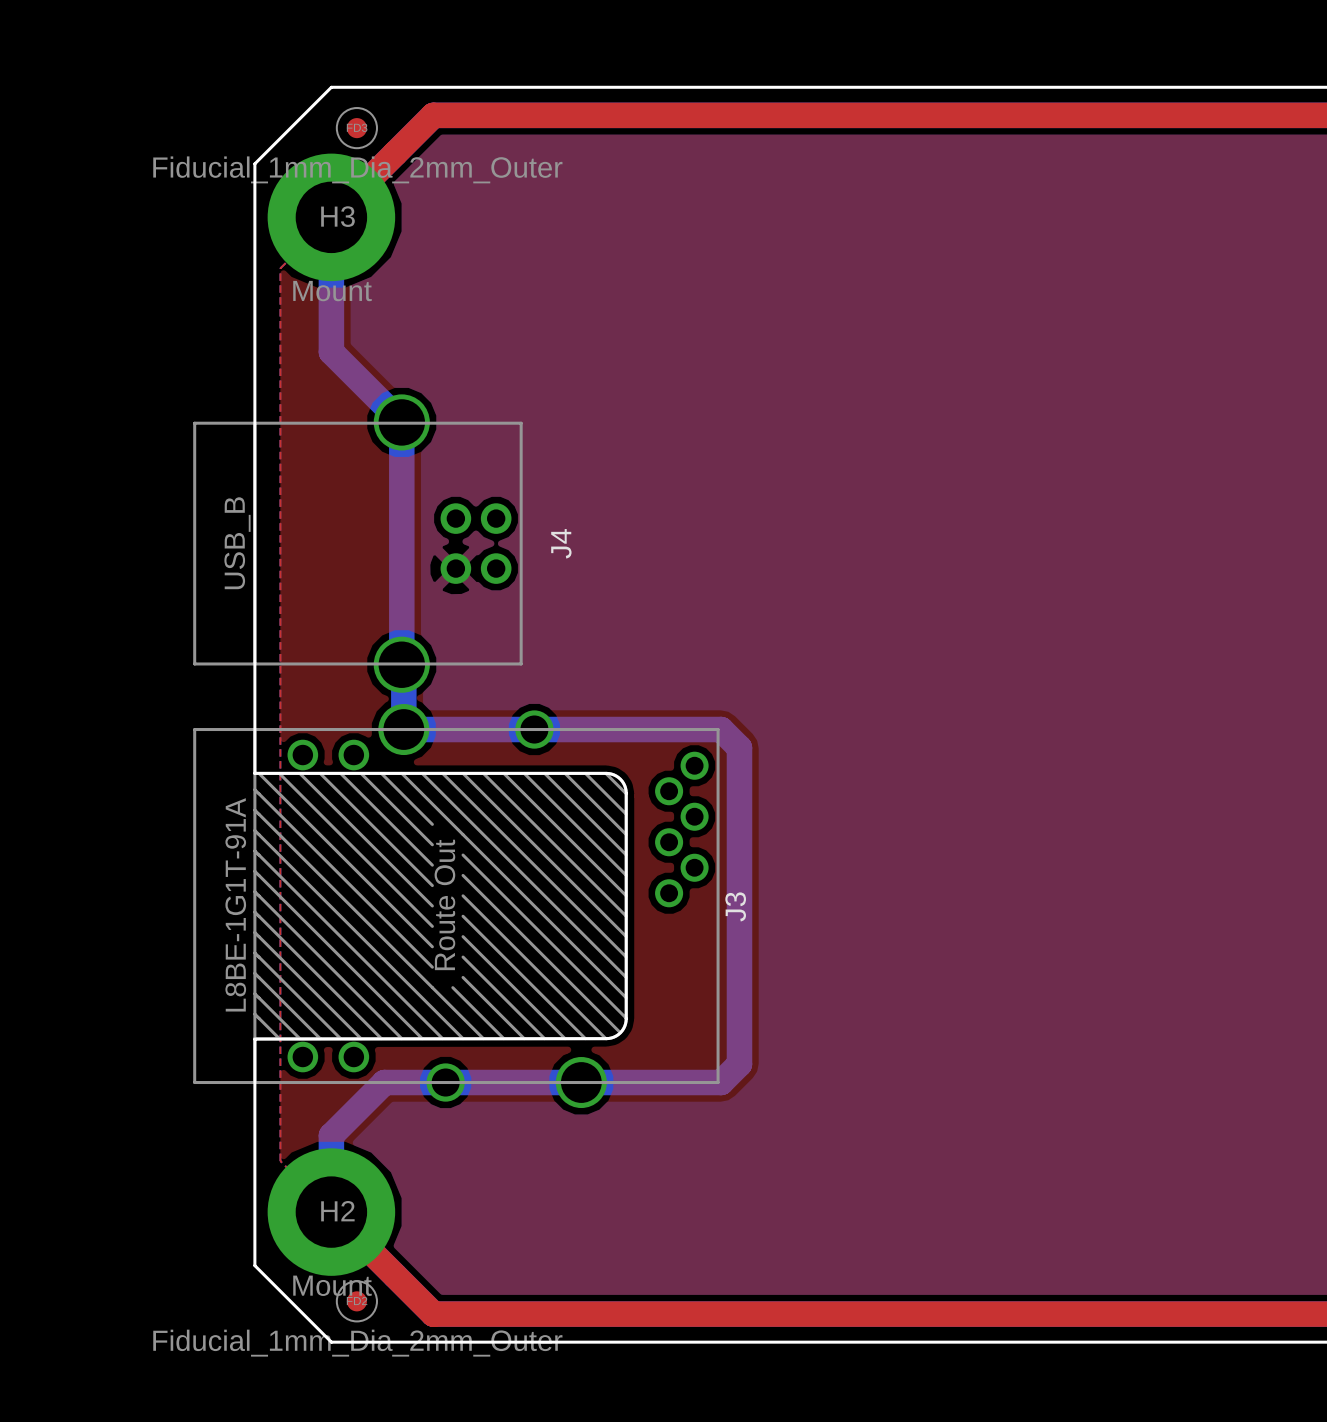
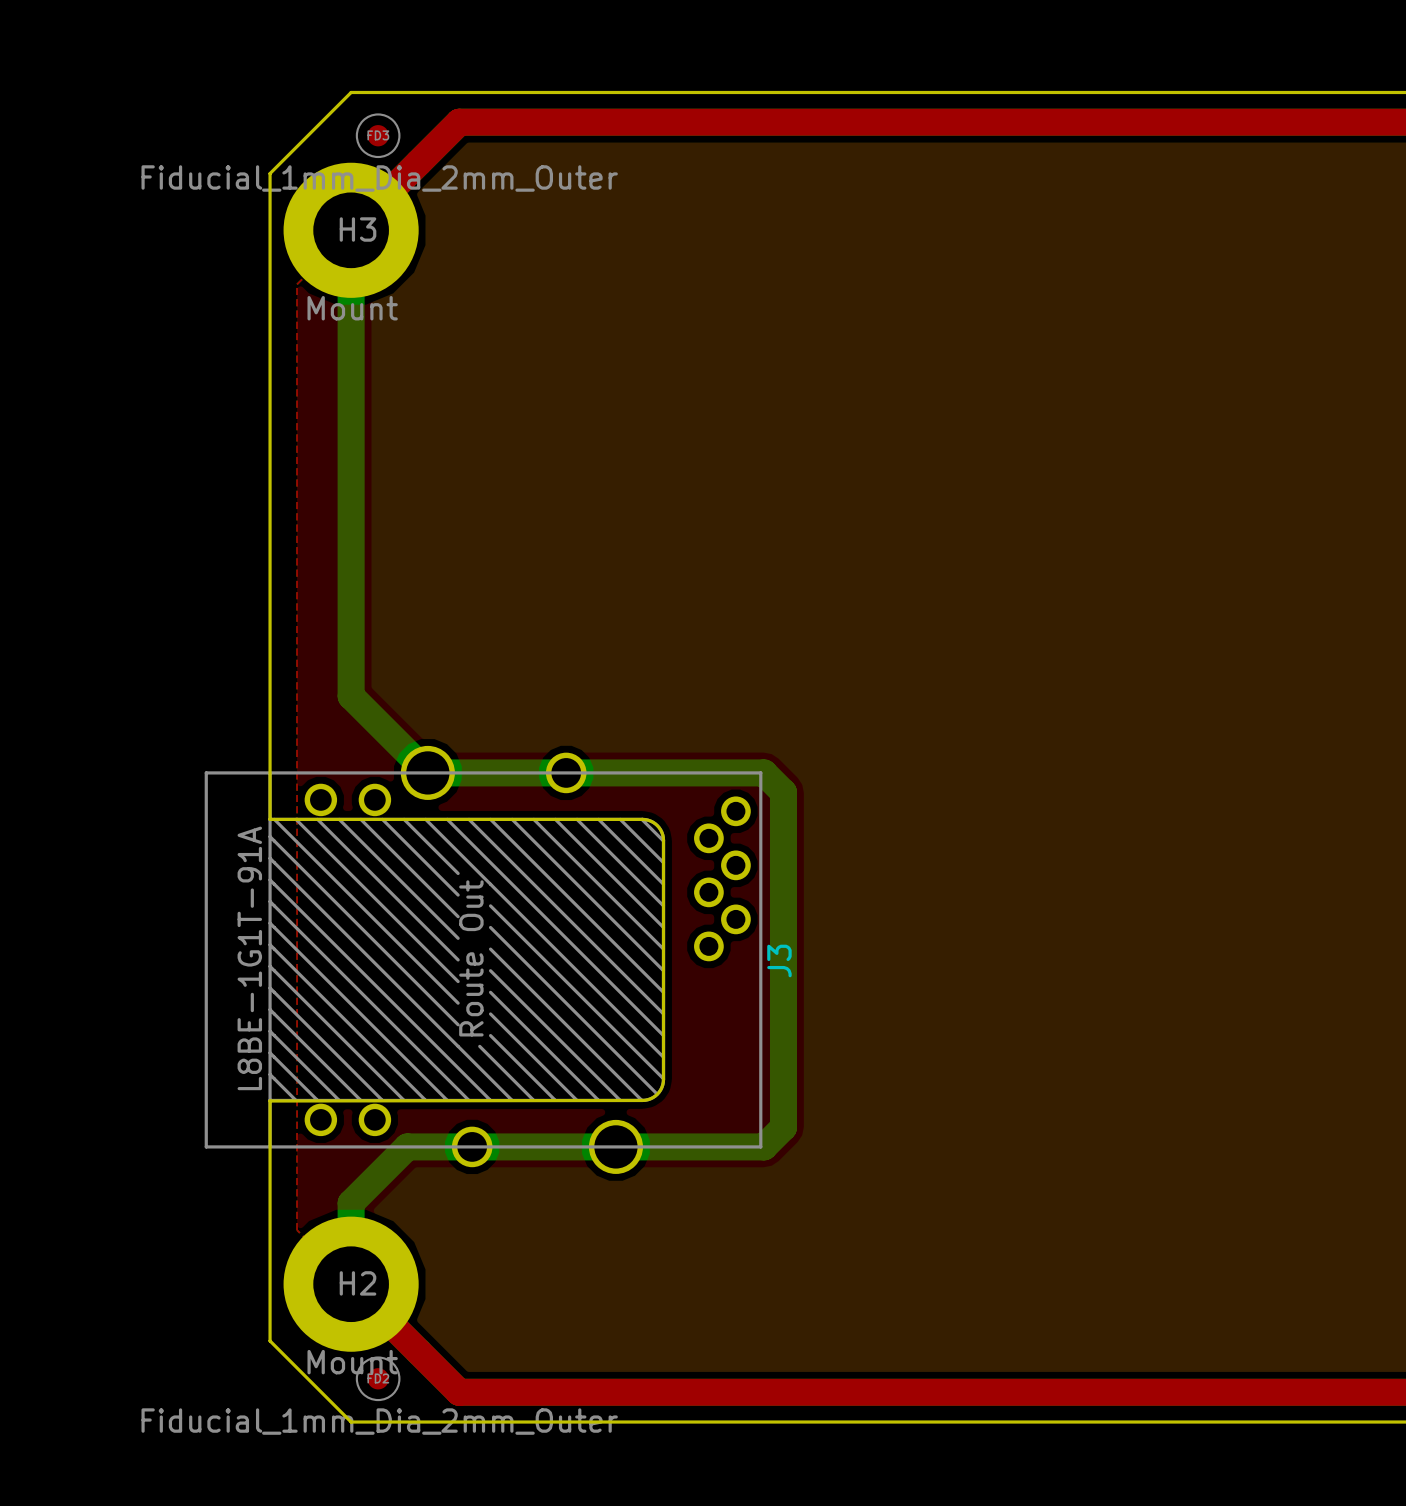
bottom track: (331, 352) (401, 422) (401, 664) (403, 666) (403, 729) -> (351, 372) (351, 696) (427, 772)
J4: USB_B (357, 543) -> none

